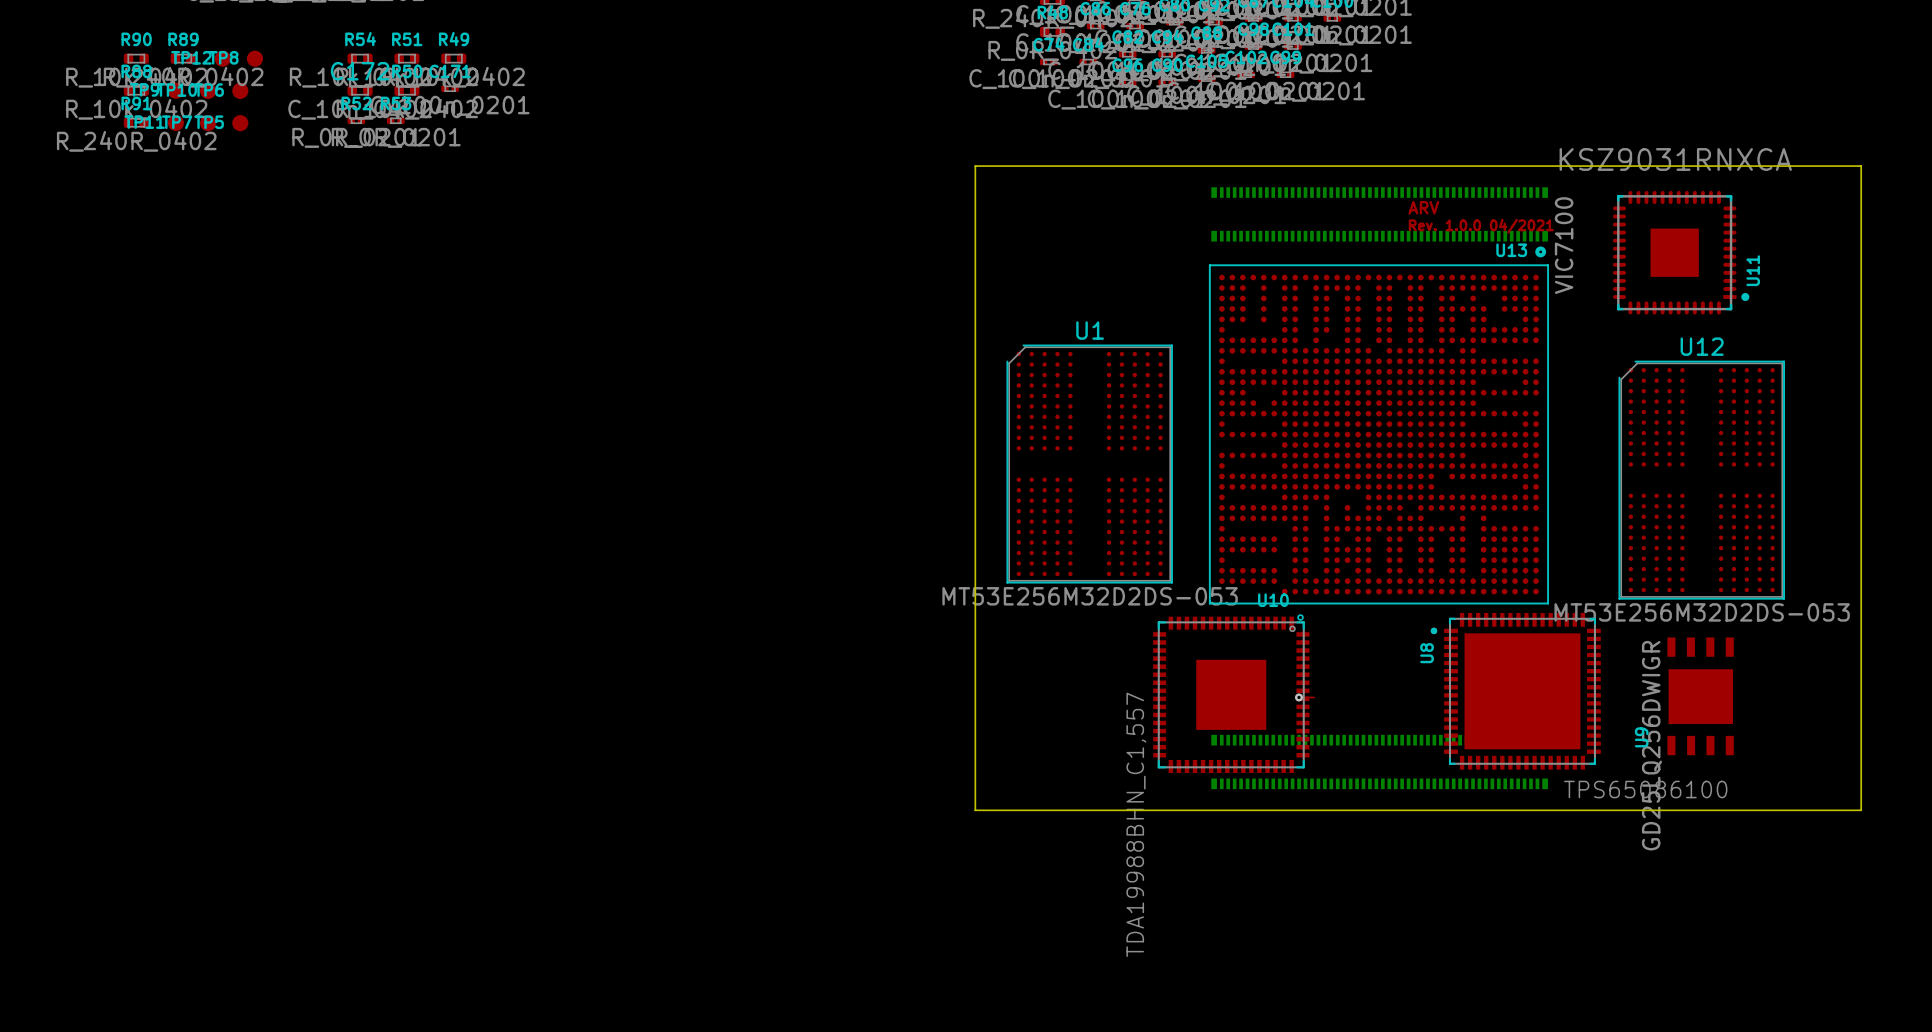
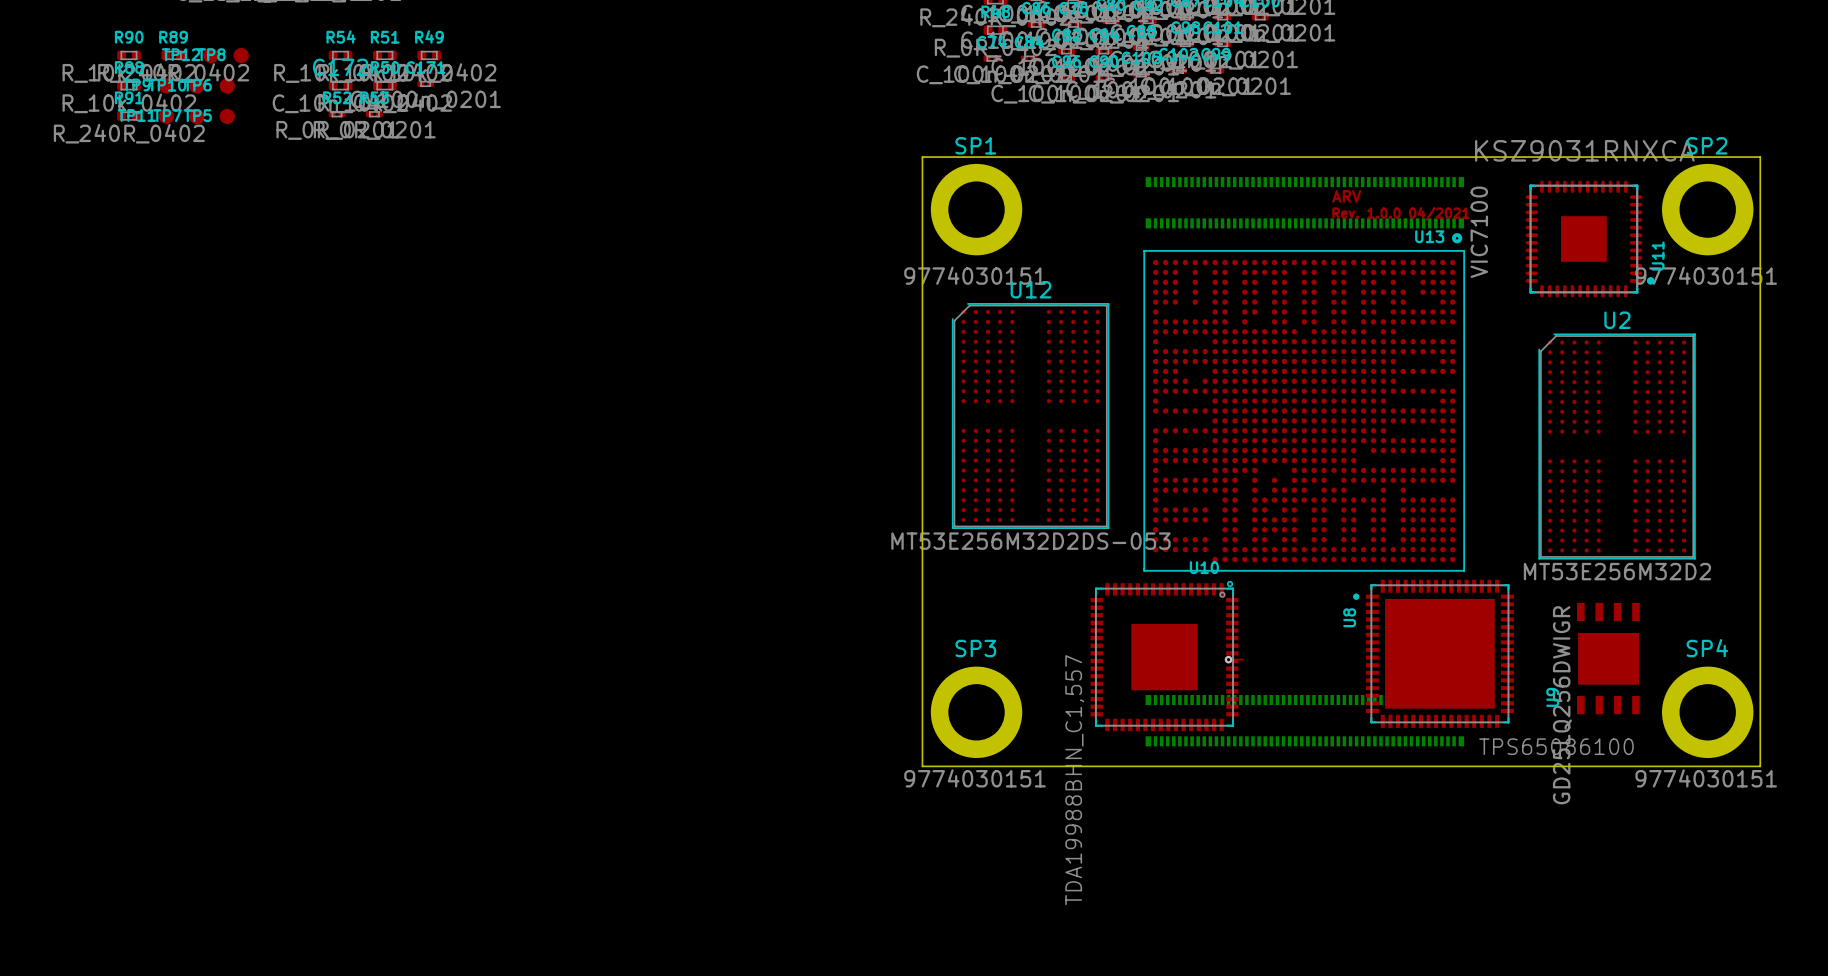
SP1: none -> 9774030151 (976, 209)
SP2: none -> 9774030151 (1707, 209)
U1: MT53E256M32D2DS-053 (1089, 464) -> none
U2: none -> MT53E256M32D2 (1617, 446)
U12 position: (1701, 480) -> (1030, 416)
SP3: none -> 9774030151 (976, 712)
SP4: none -> 9774030151 (1707, 712)

